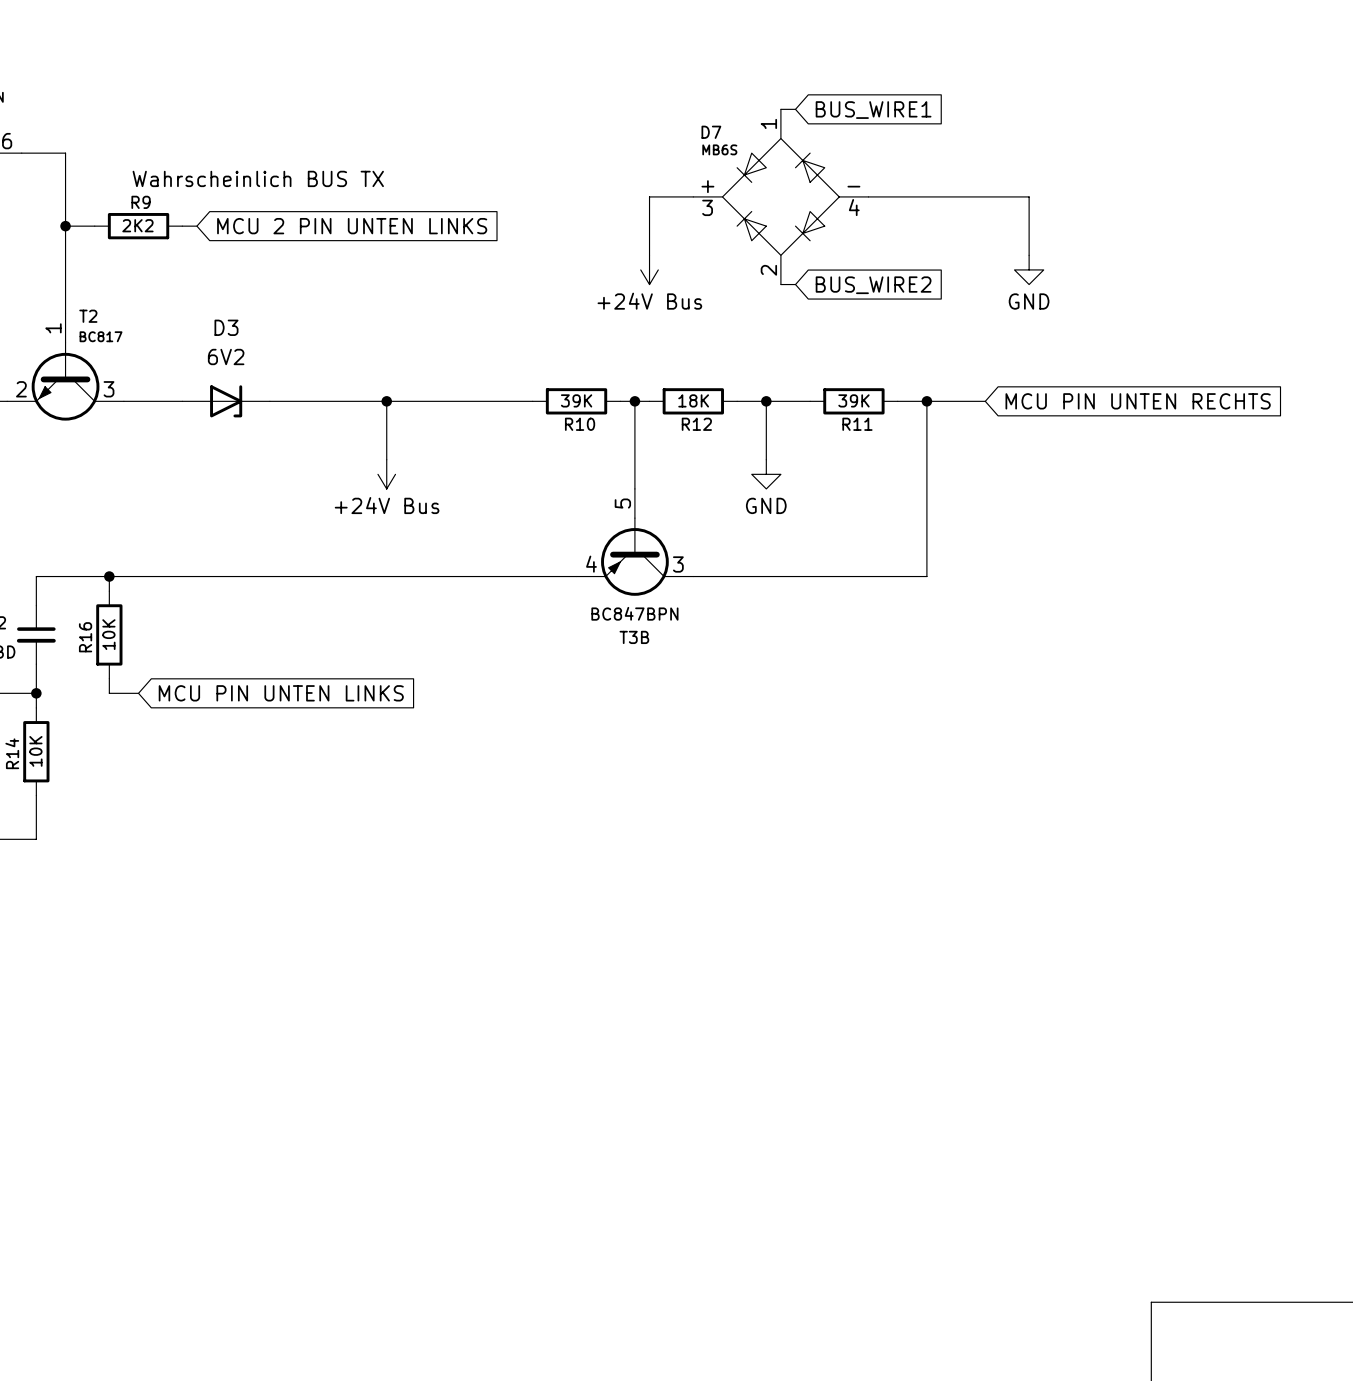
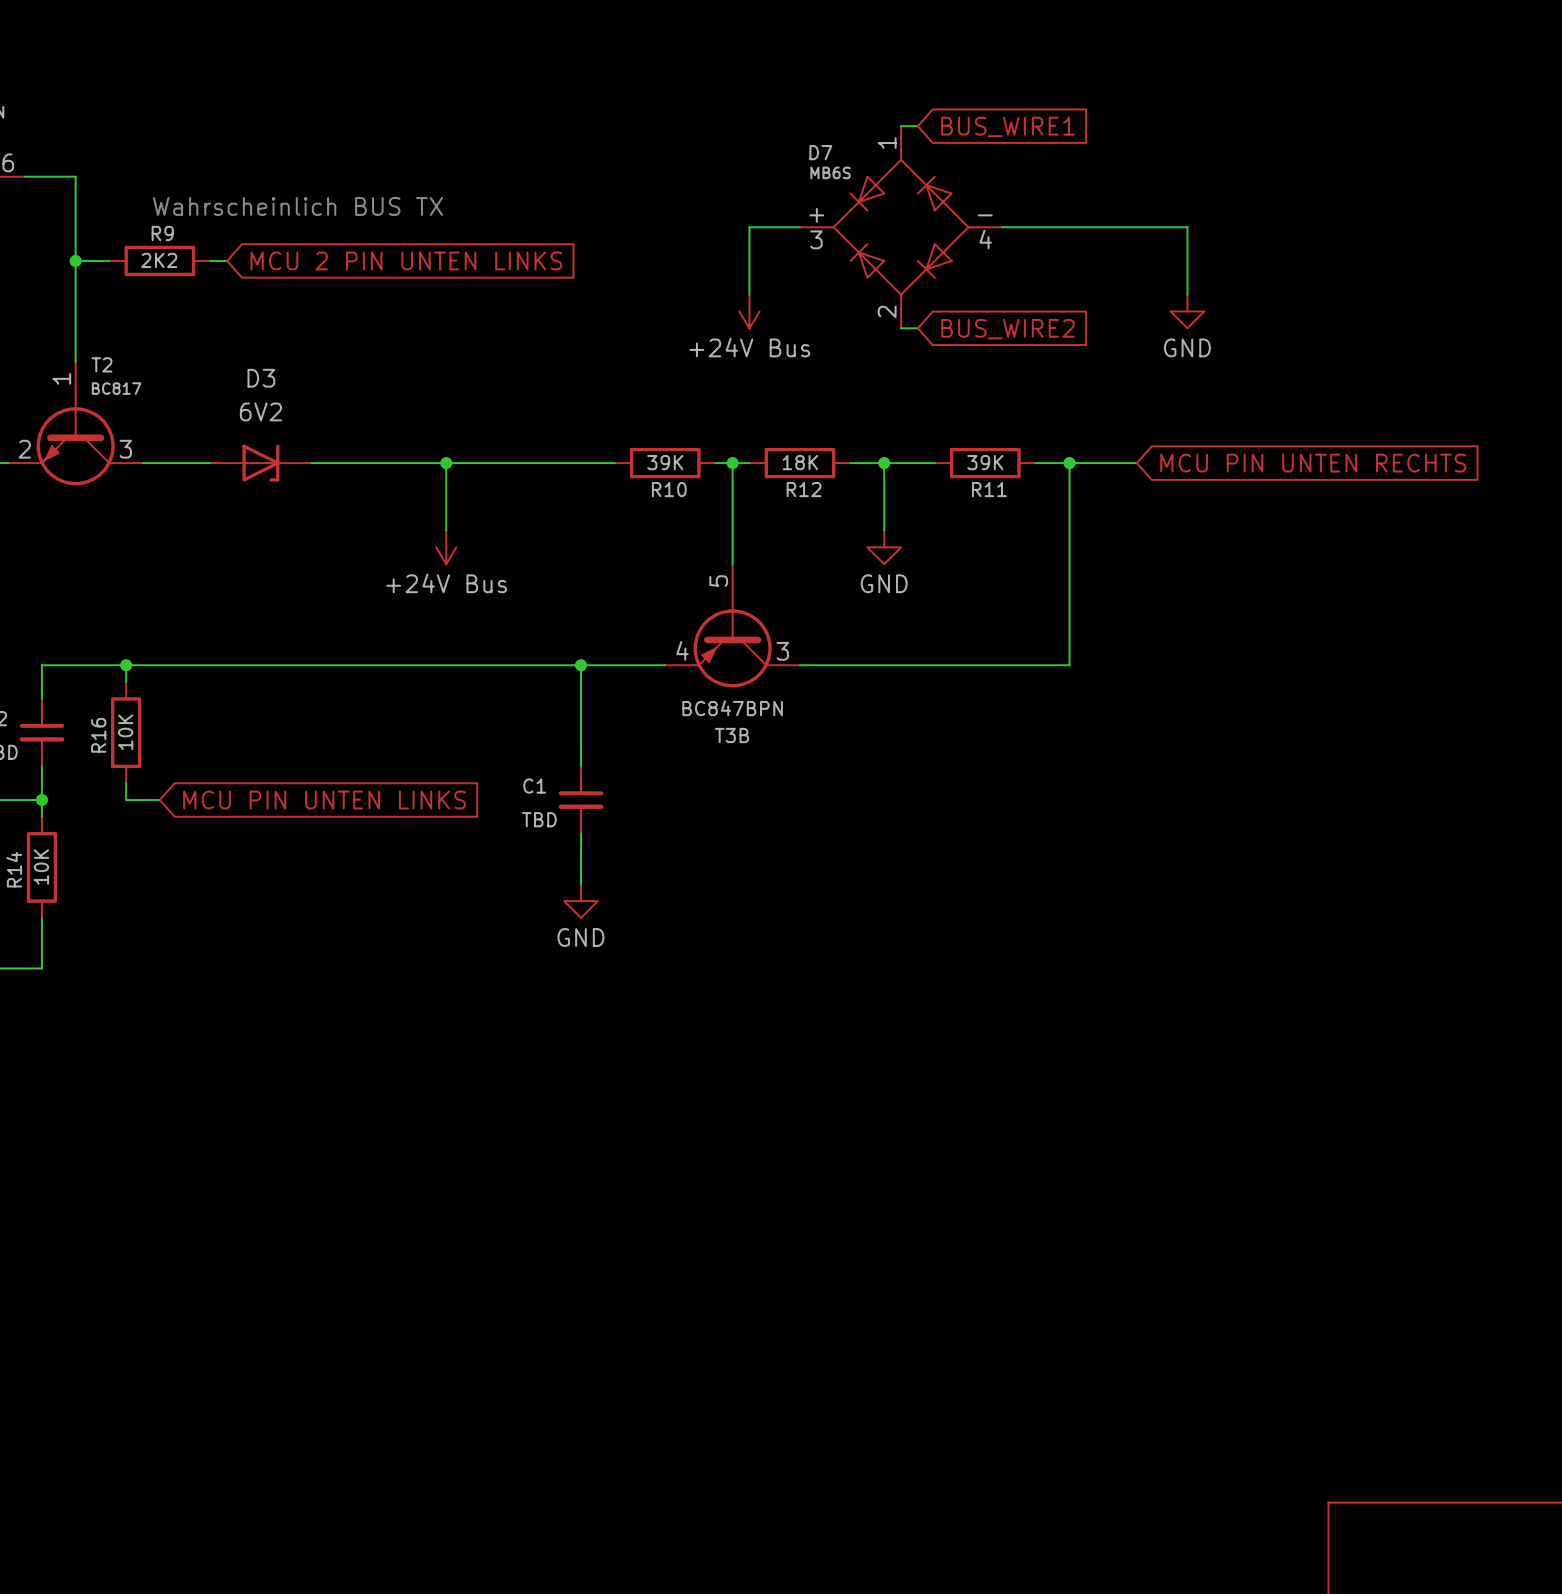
wire: none -> (581, 665) (581, 766)
junction: none -> (581, 665)
C1: none -> TBD (581, 800)
wire: none -> (581, 833) (581, 884)
power symbol: none -> GND (581, 901)

